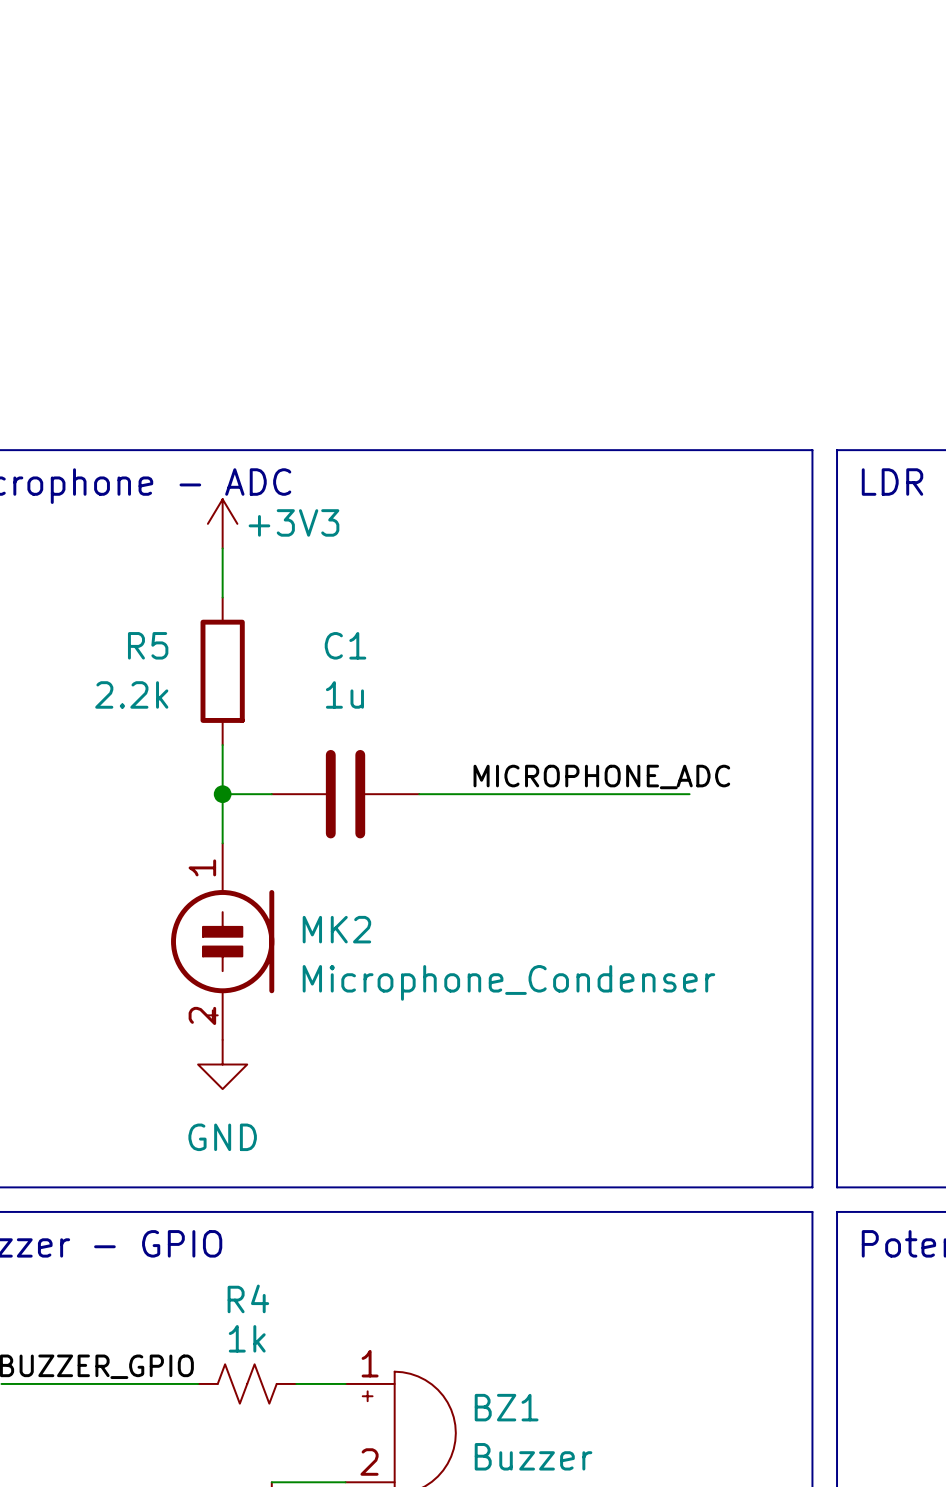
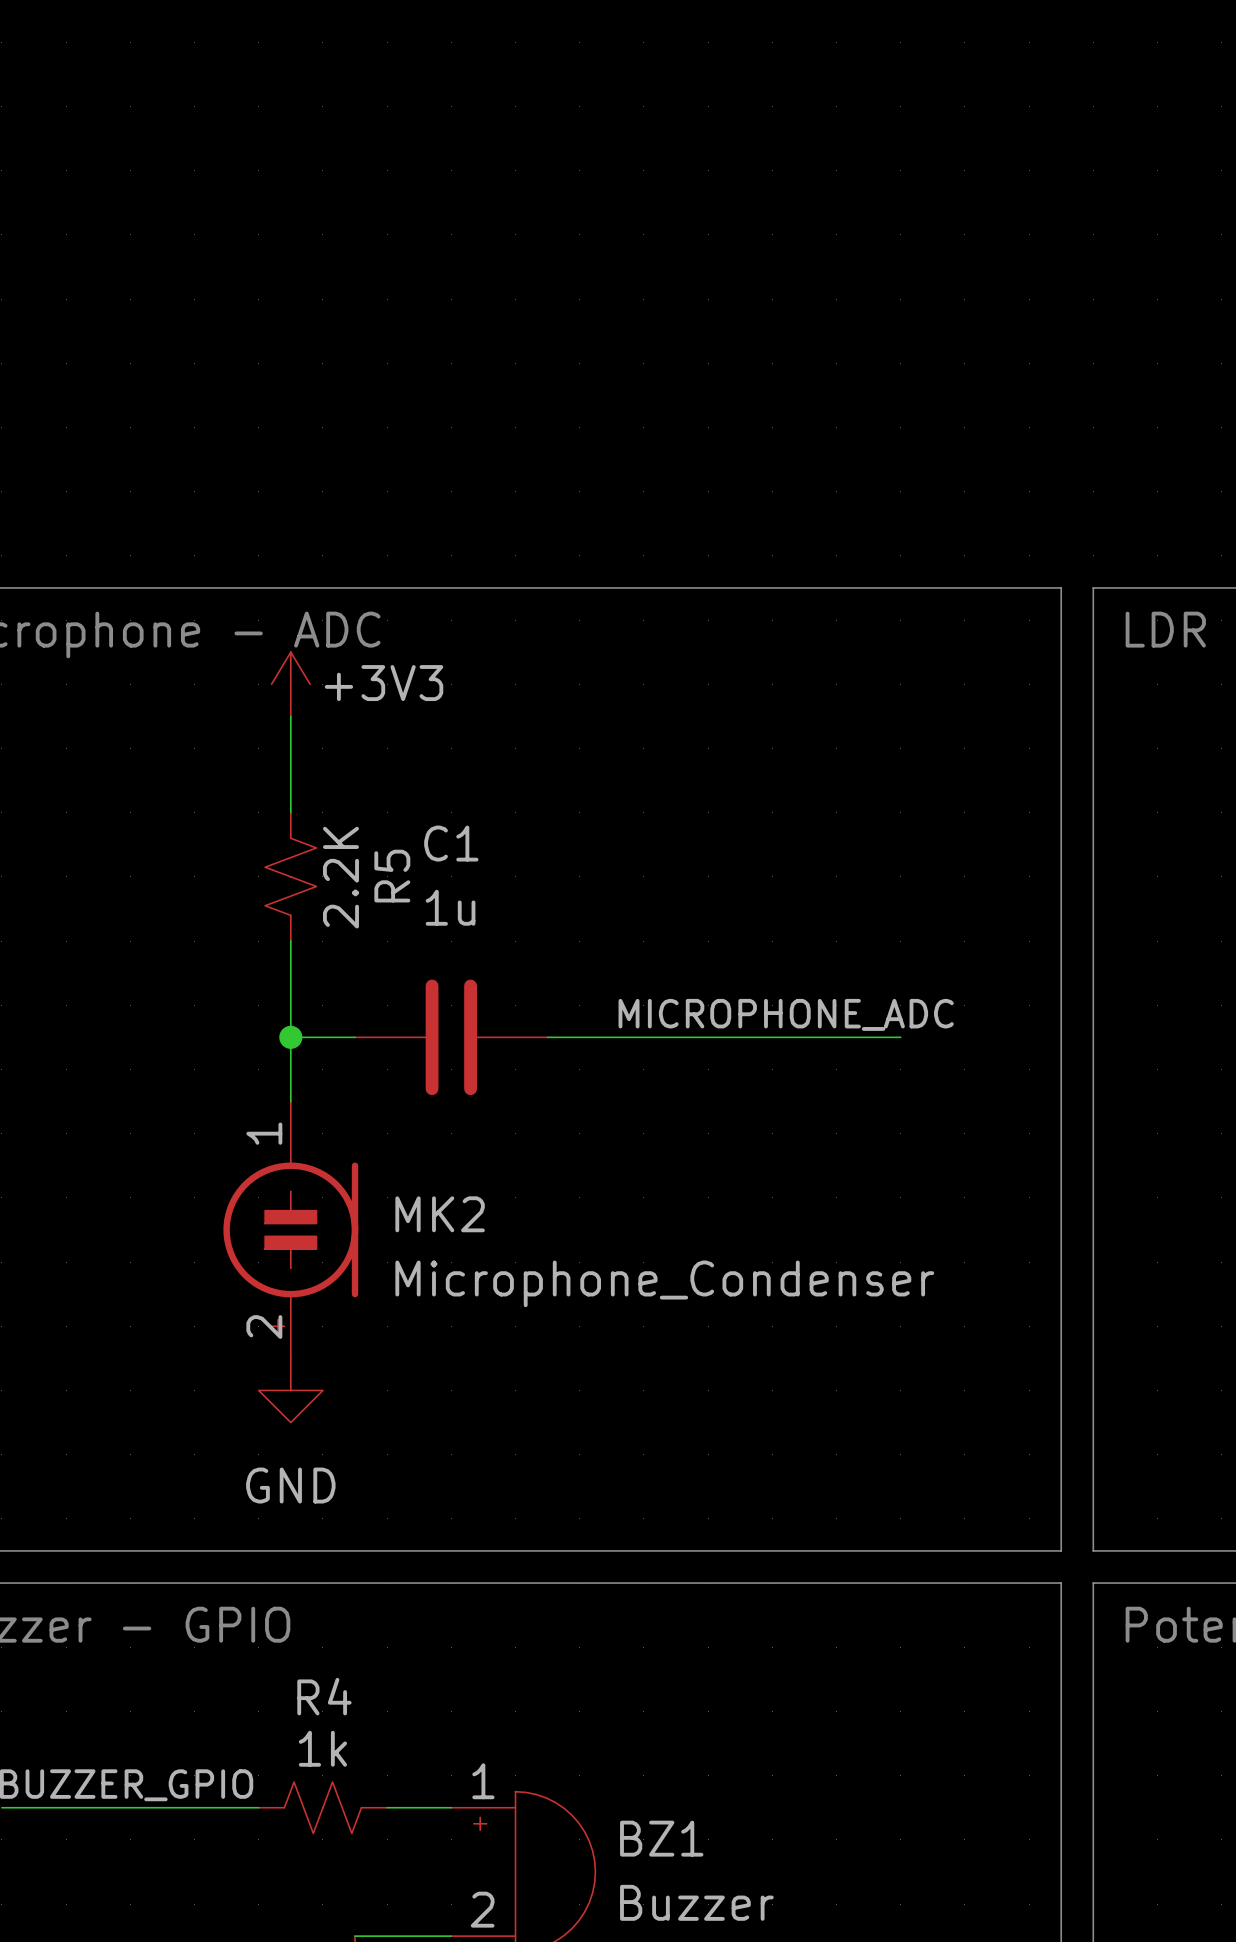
R5 symbol: [200, 597, 245, 746] -> [265, 812, 317, 942]
R5 name position: R5 (148, 645) -> R5 (392, 876)
R5 value: 2.2k (131, 694) -> 2.2K (340, 877)

